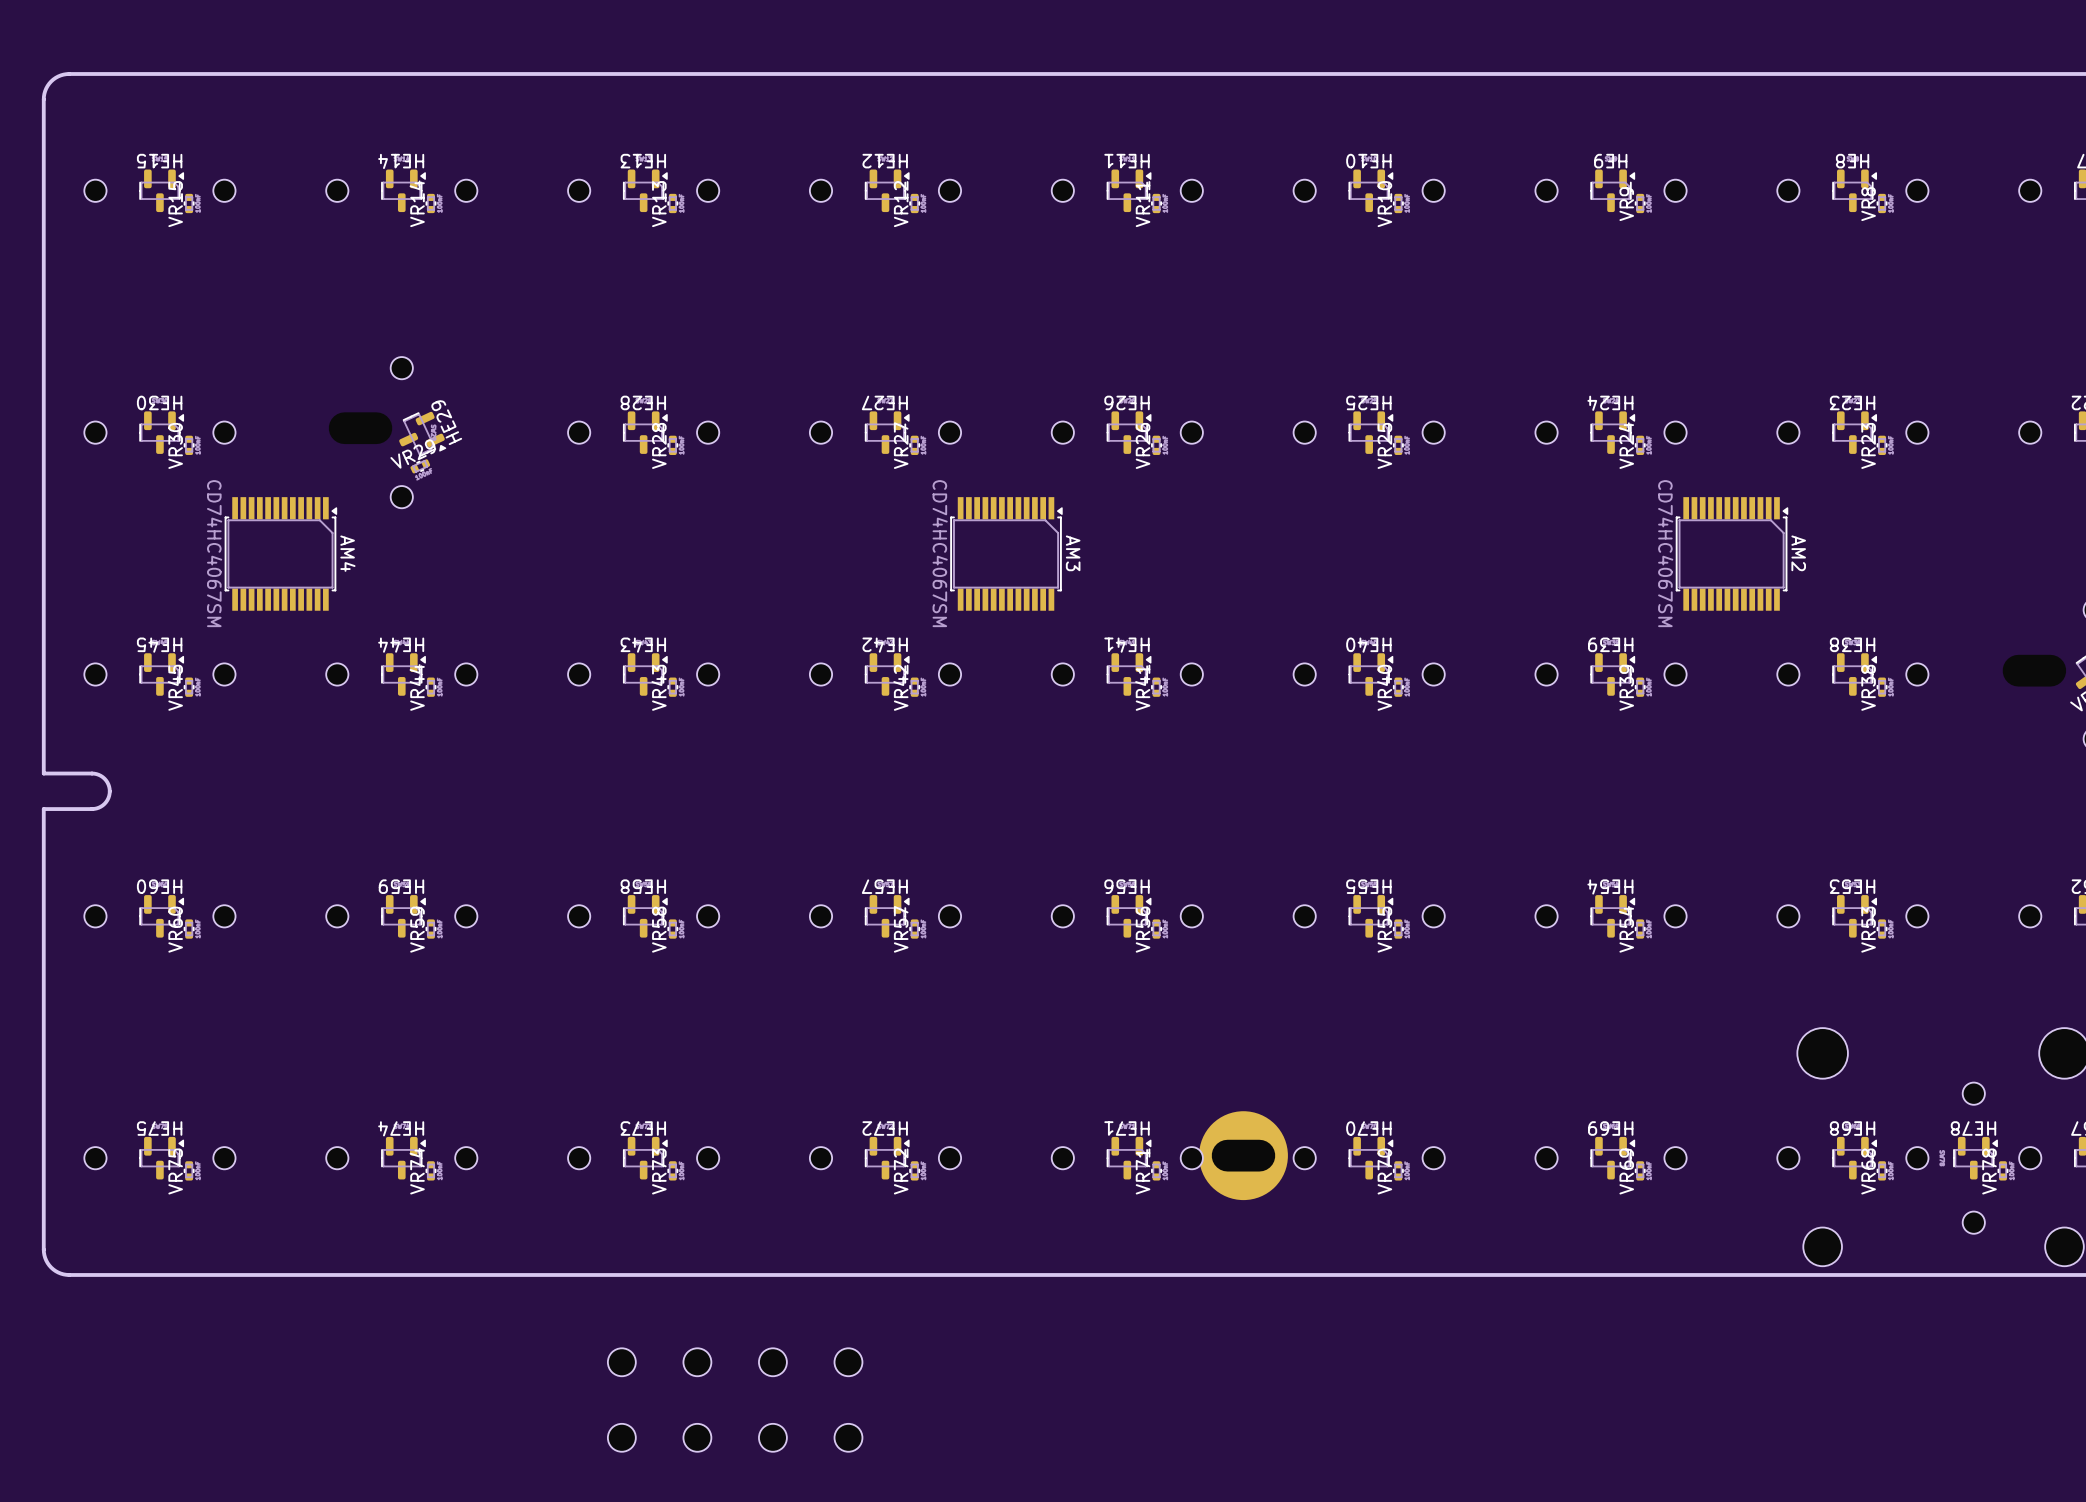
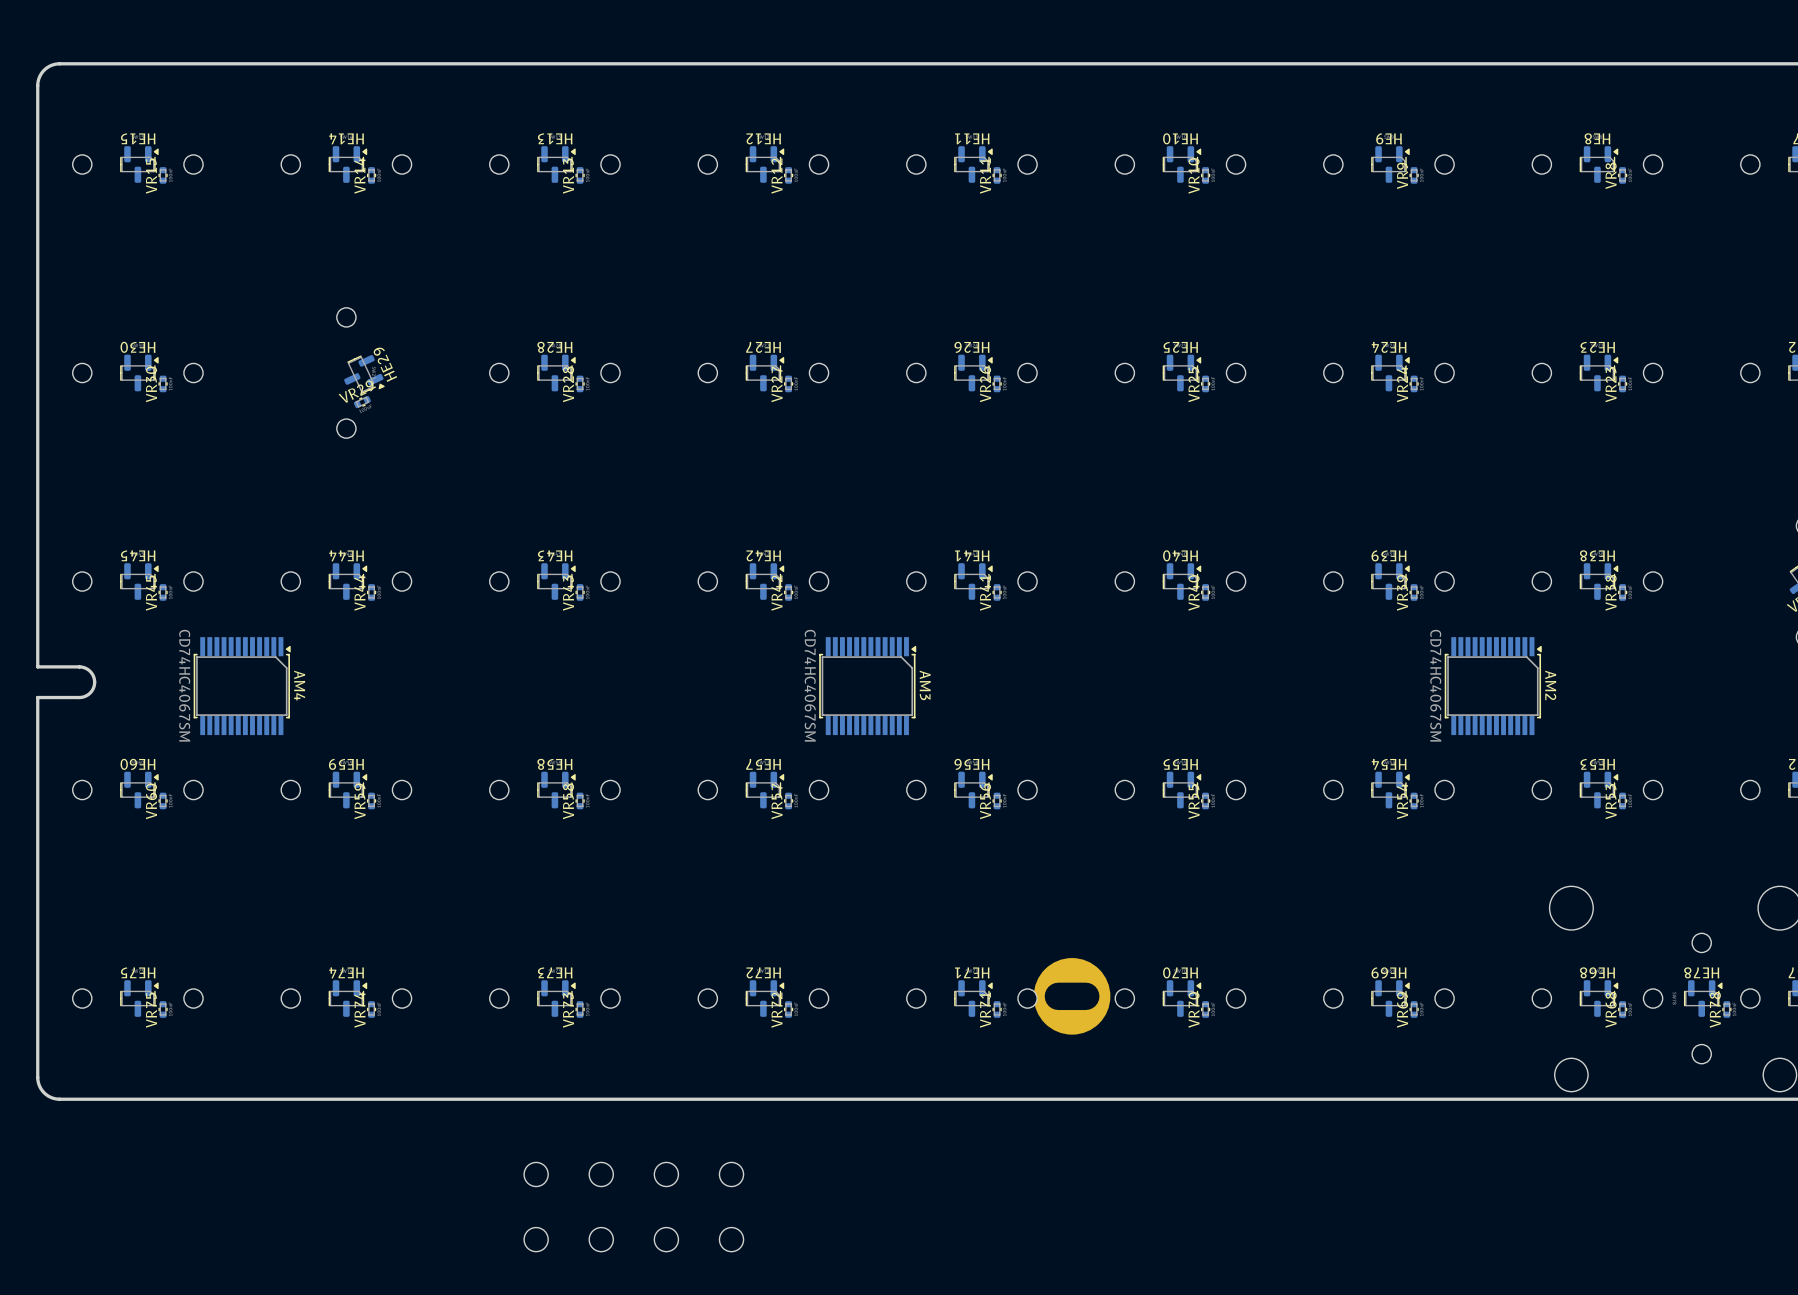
AM4 position: (280, 553) -> (242, 686)
AM3 position: (1006, 553) -> (867, 686)
AM2 position: (1731, 553) -> (1493, 686)

